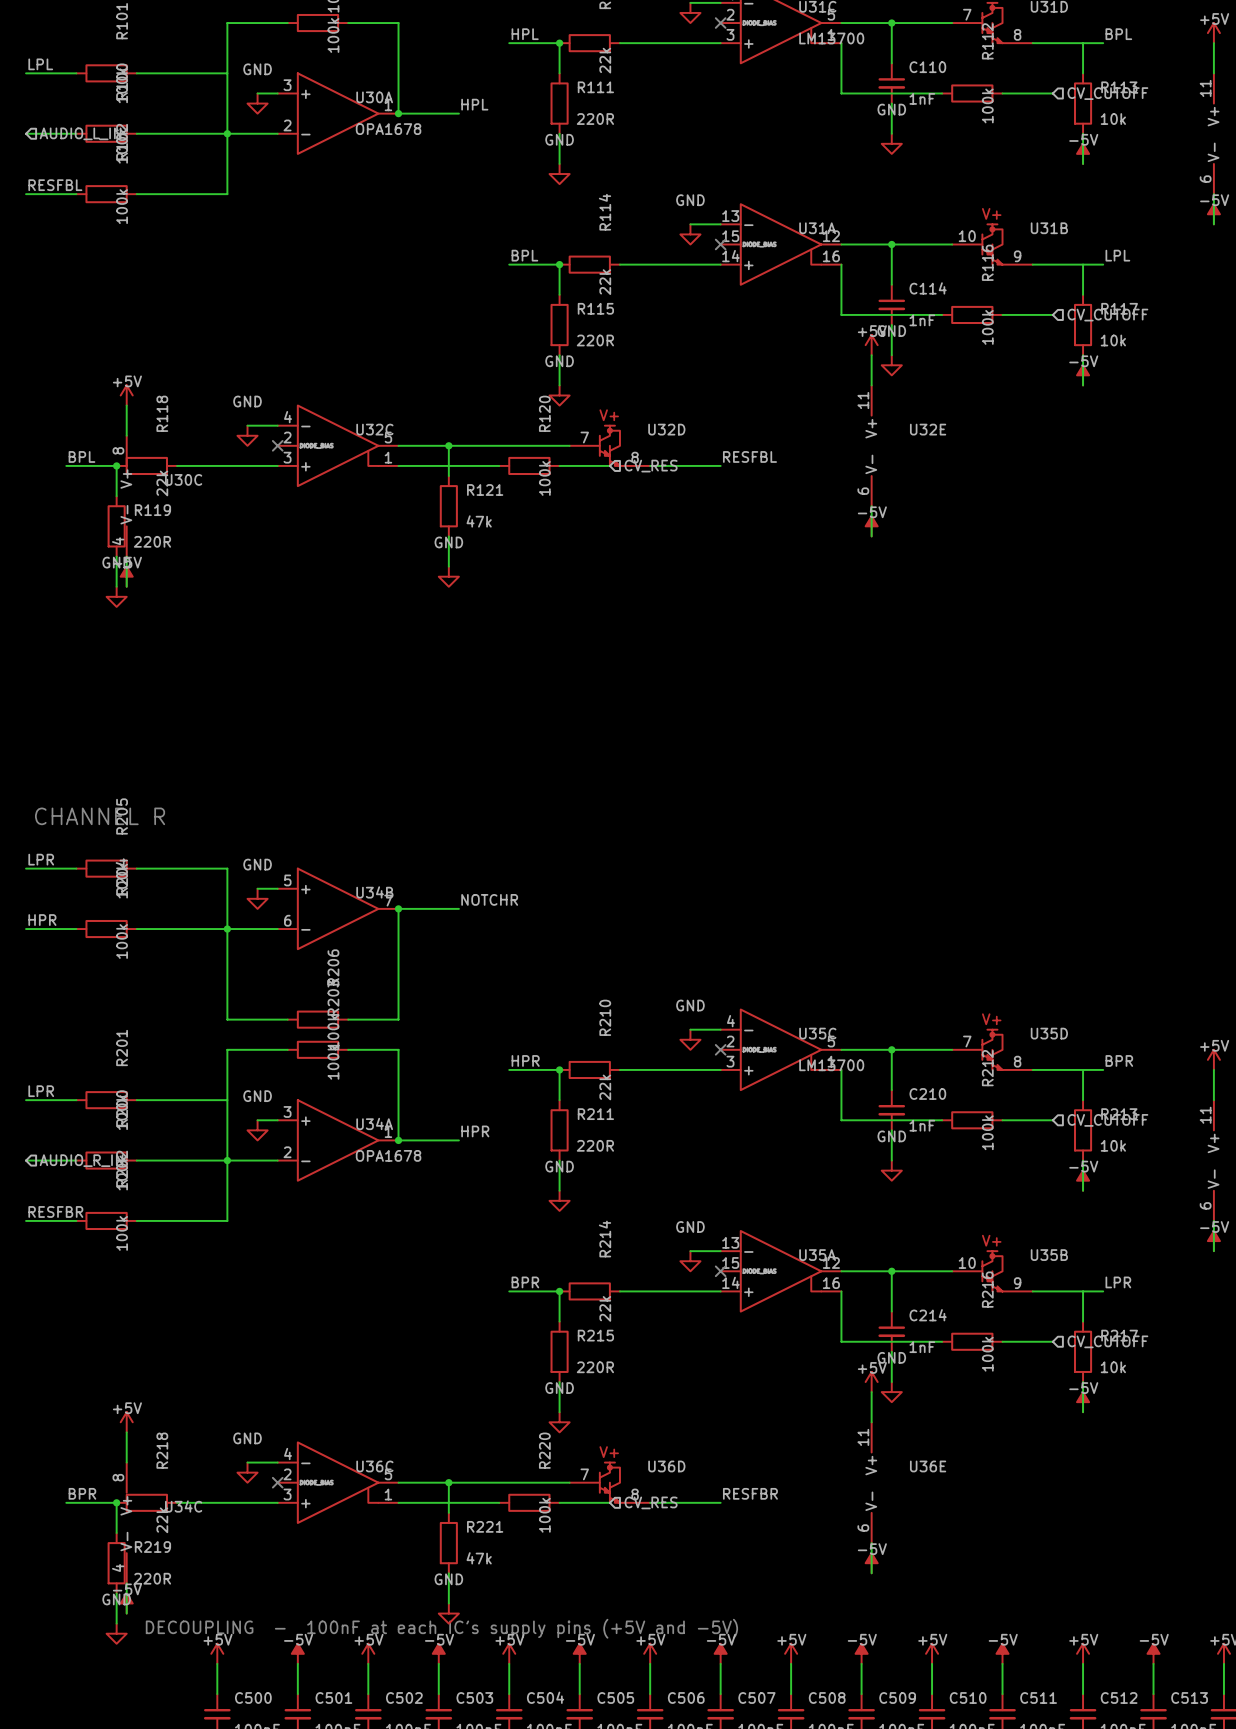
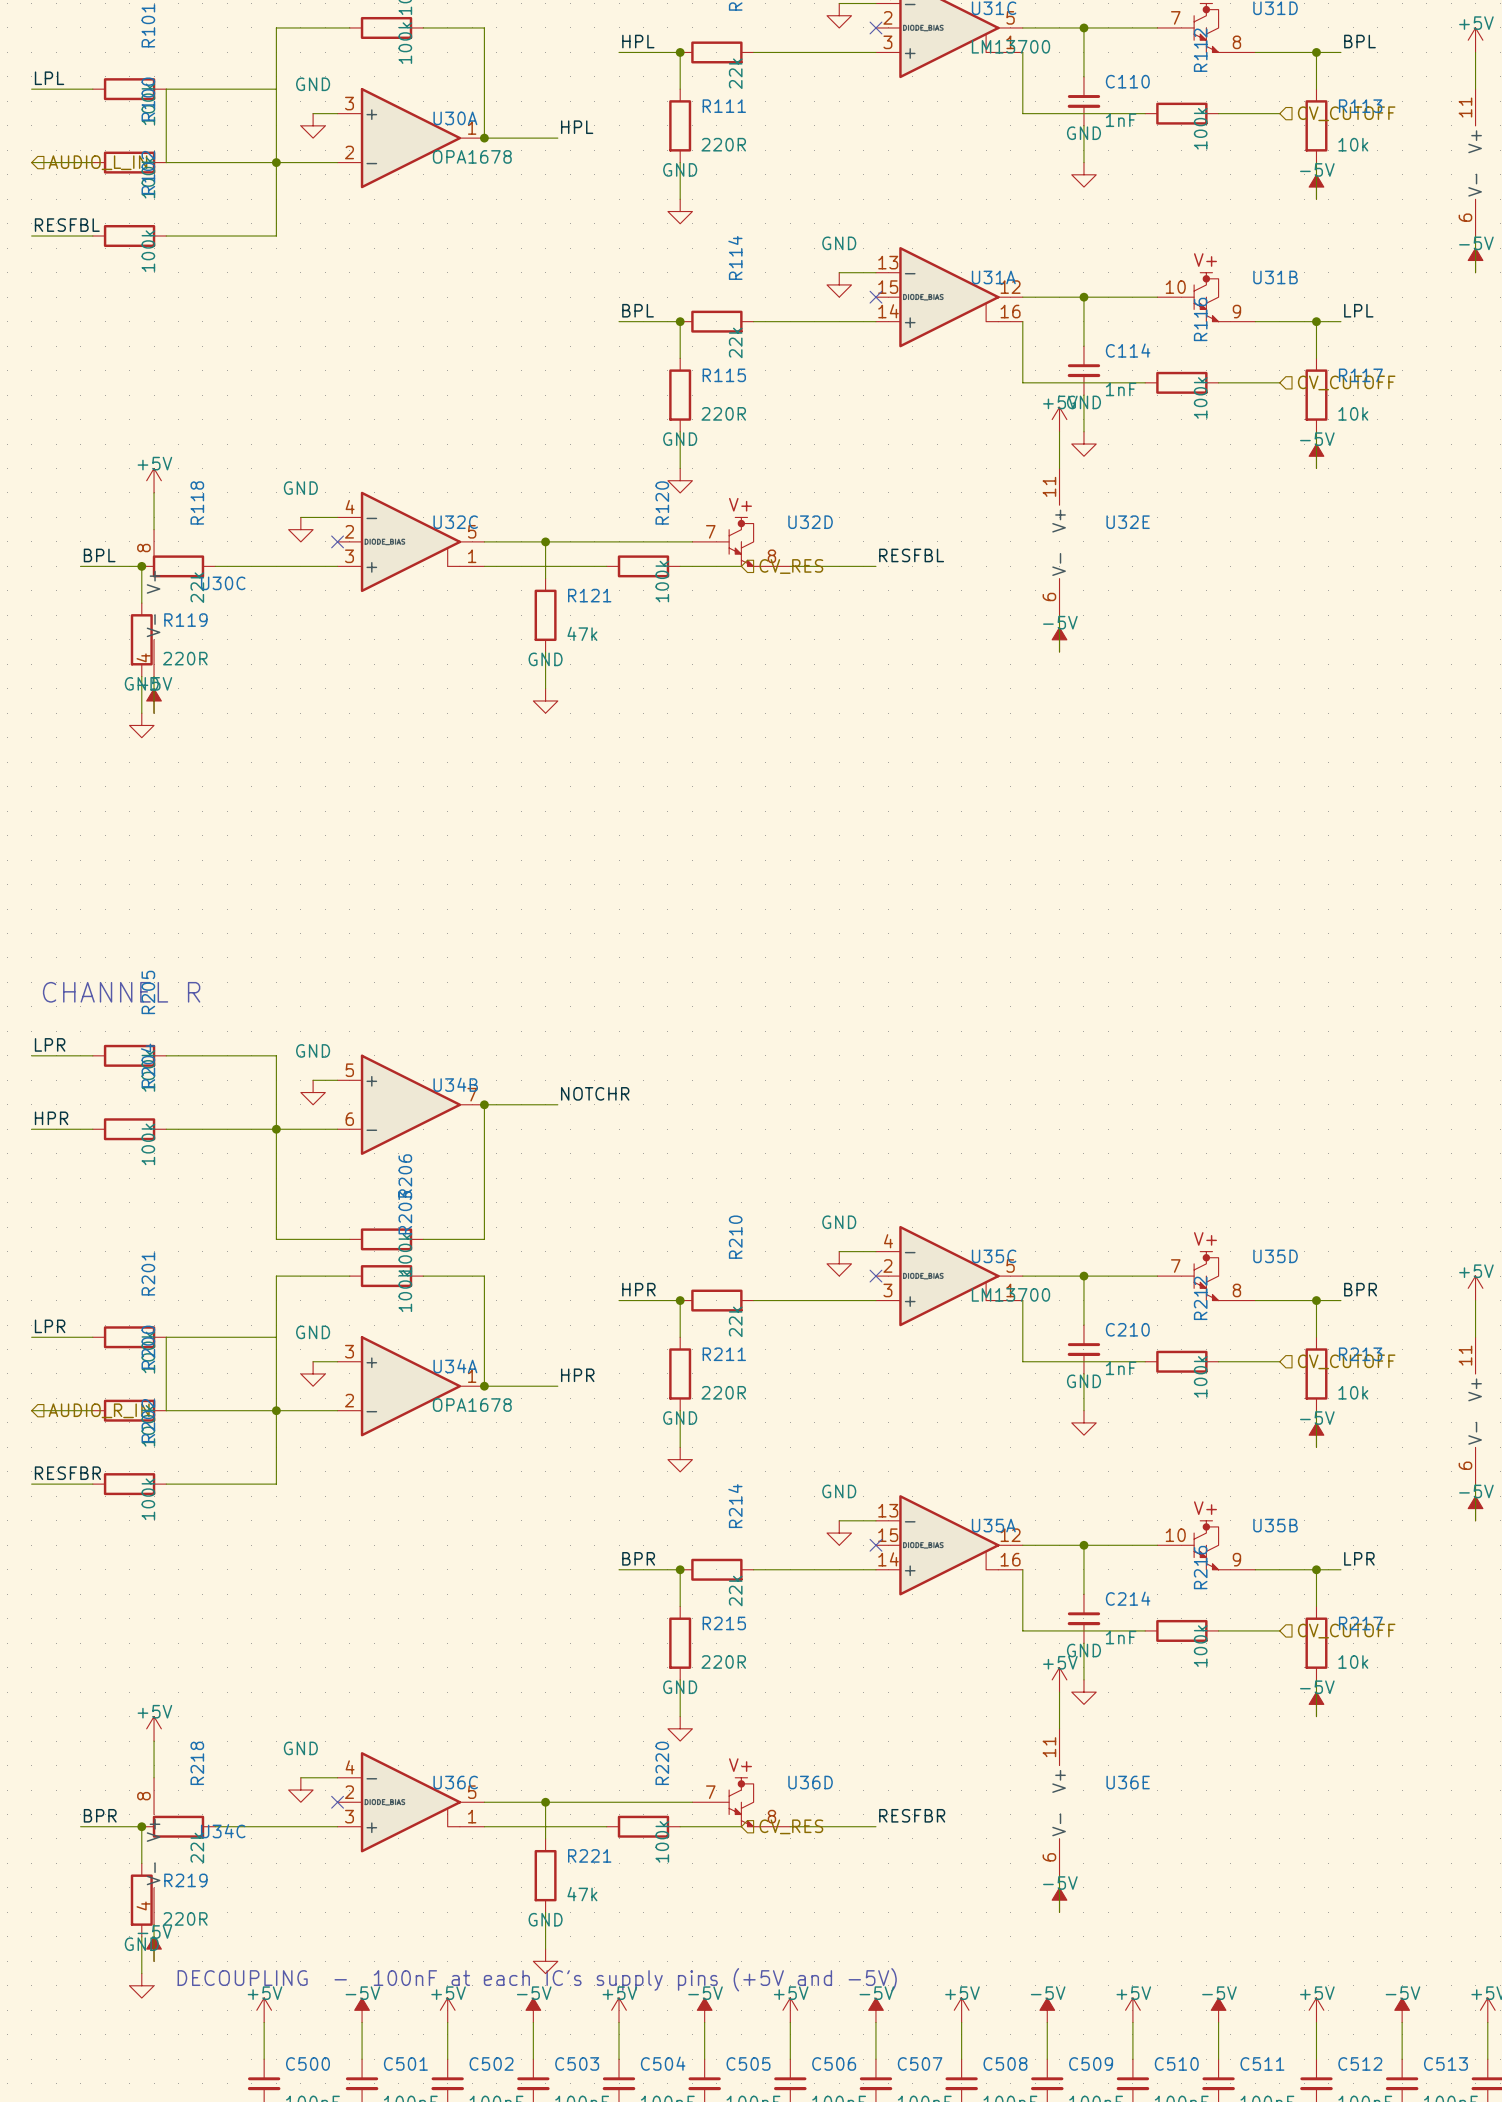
junction: none -> (1316, 52)
wire: none -> (166, 89) (166, 162)
junction: none -> (1316, 321)
junction: none -> (1316, 1300)
wire: none -> (166, 1337) (166, 1410)
junction: none -> (1316, 1569)

